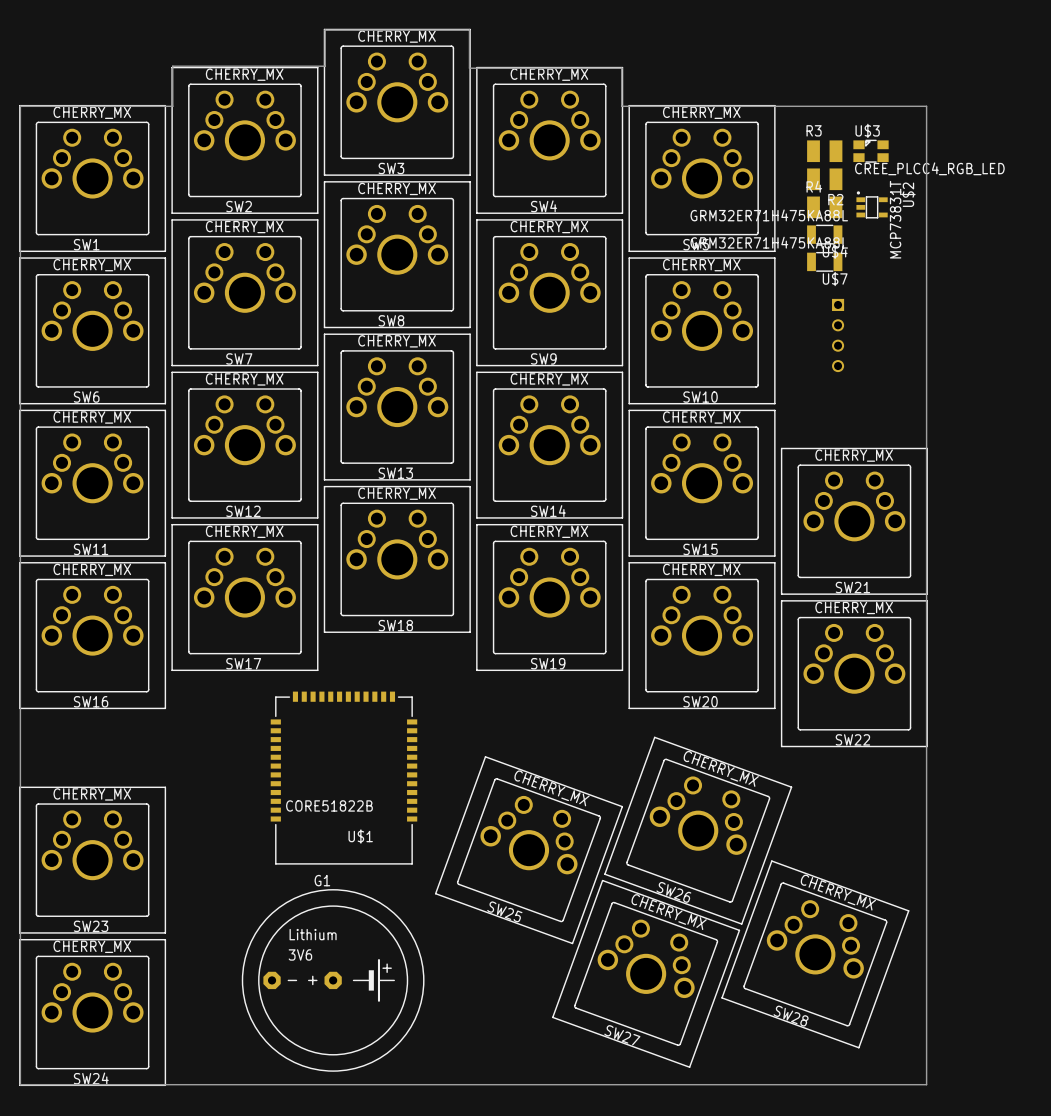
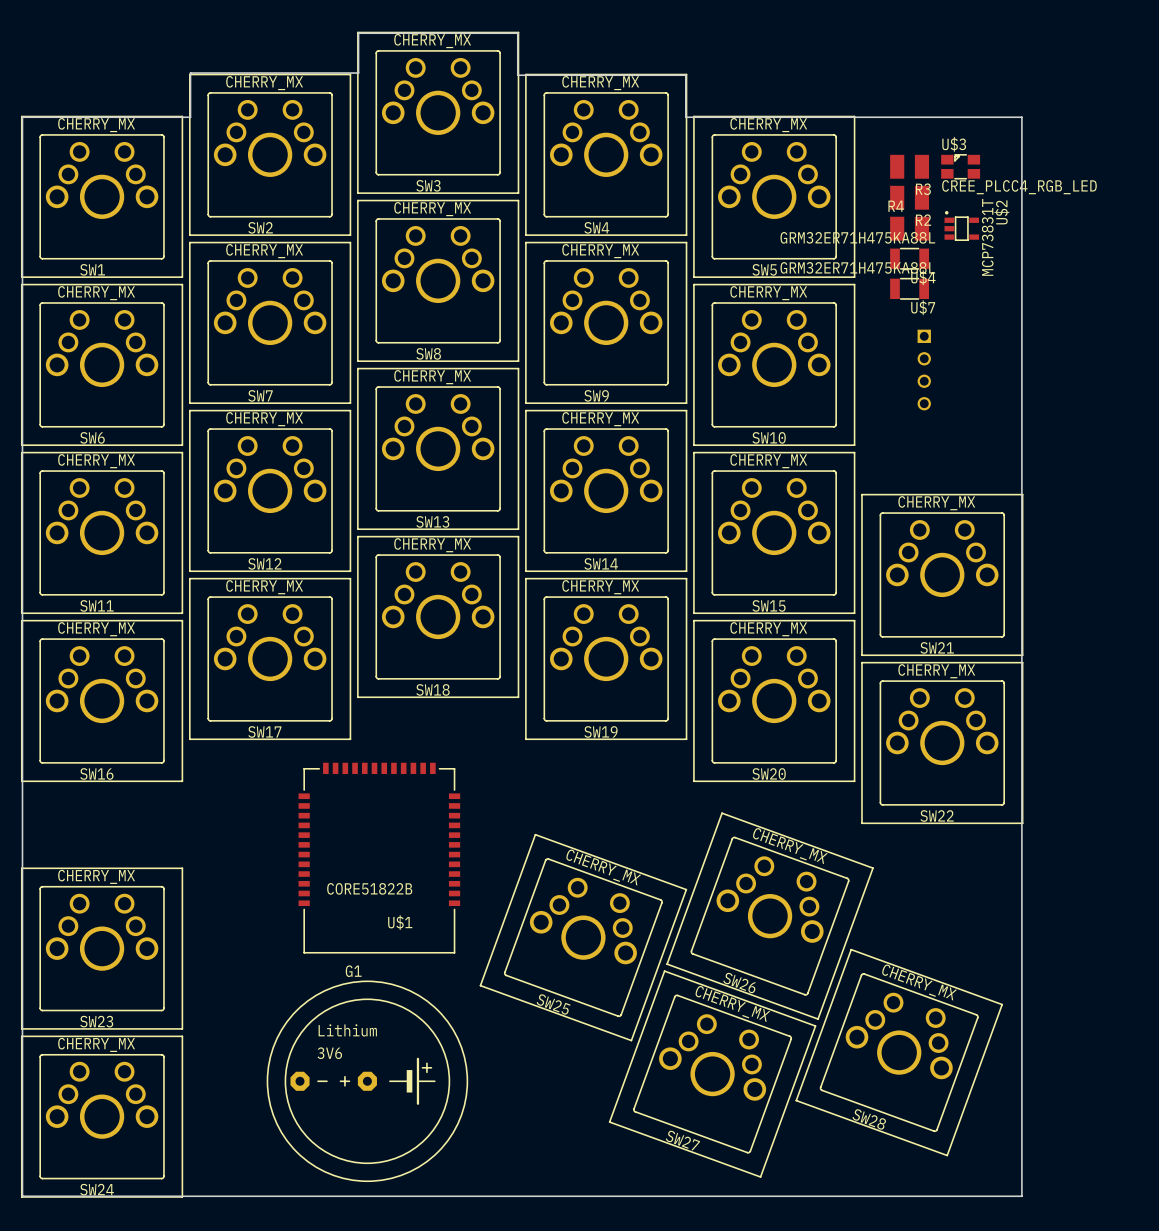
R3 name position: R3 (814, 130) -> R3 (923, 189)

